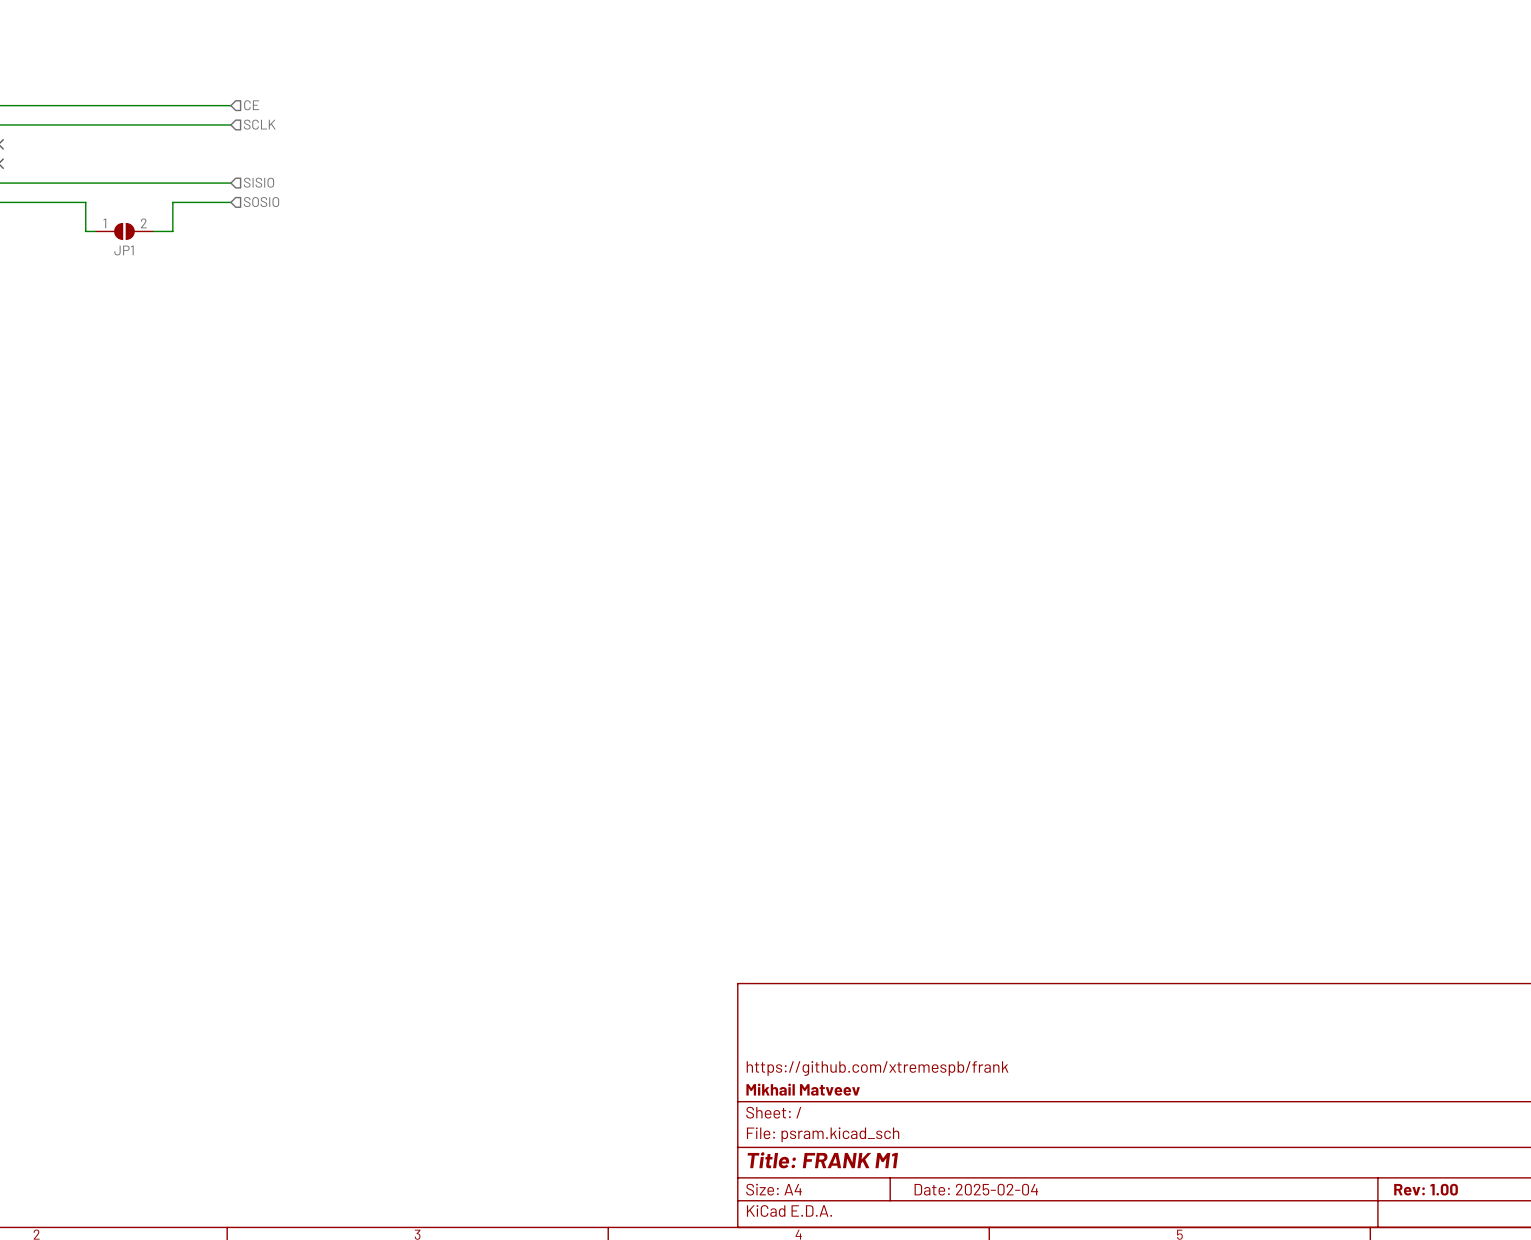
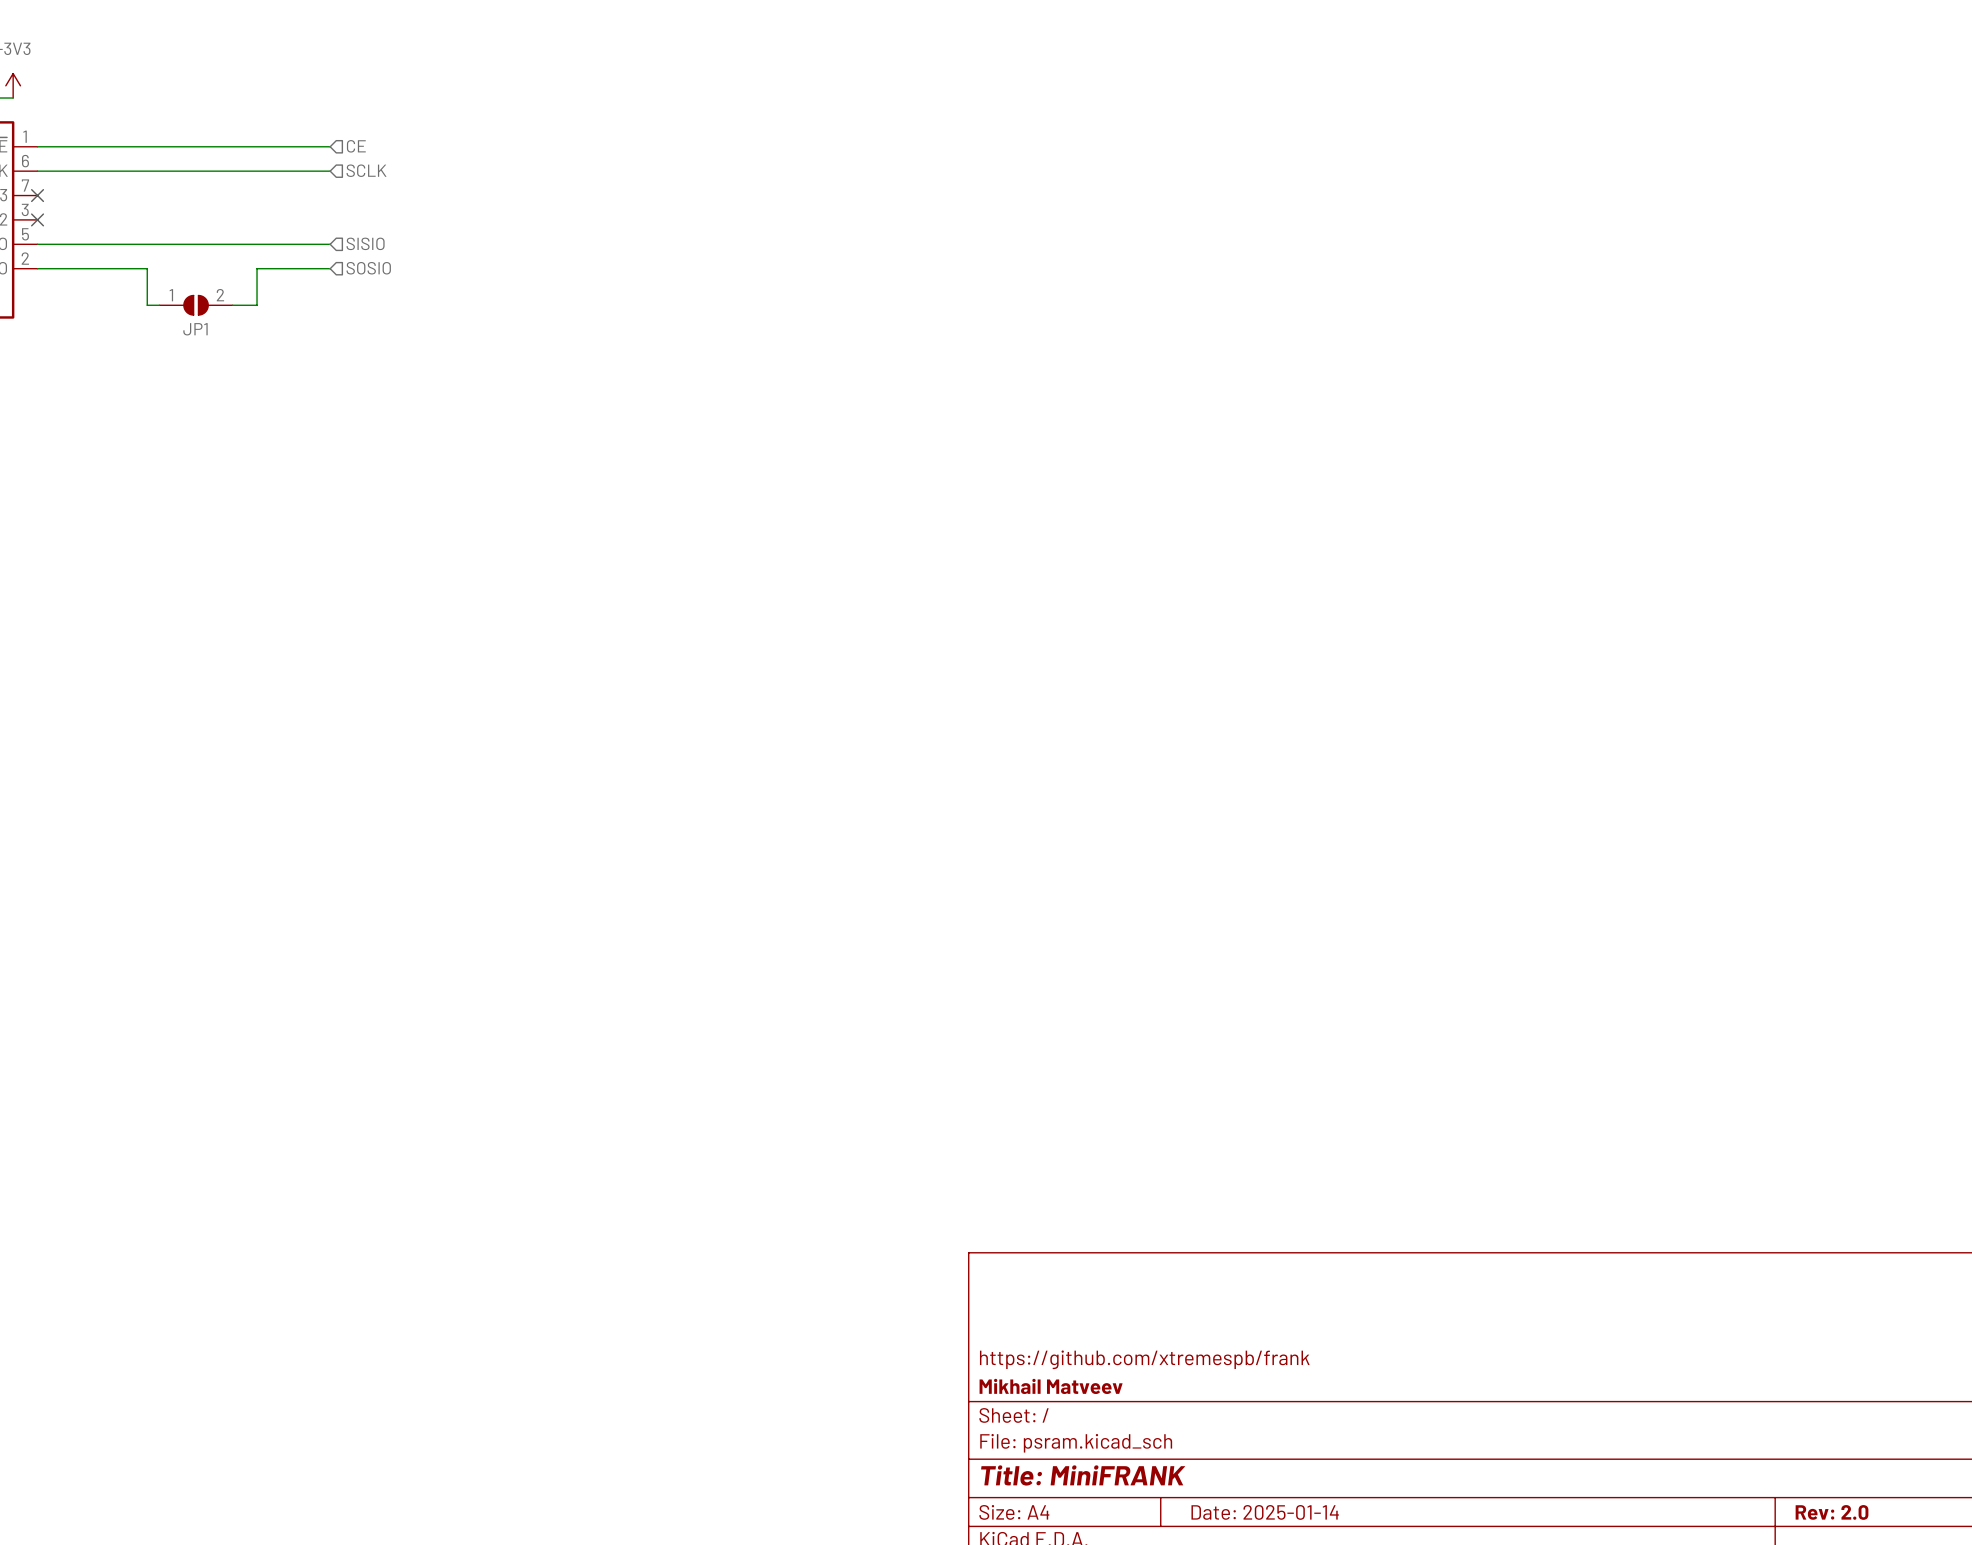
title block: Title: FRANK M1 (822, 1160) -> Title: MiniFRANK (1083, 1475)
title block: Date: 2025-02-04 (976, 1189) -> Date: 2025-01-14 (1265, 1512)
title block: Rev: 1.00 (1426, 1189) -> Rev: 2.0 (1832, 1512)

